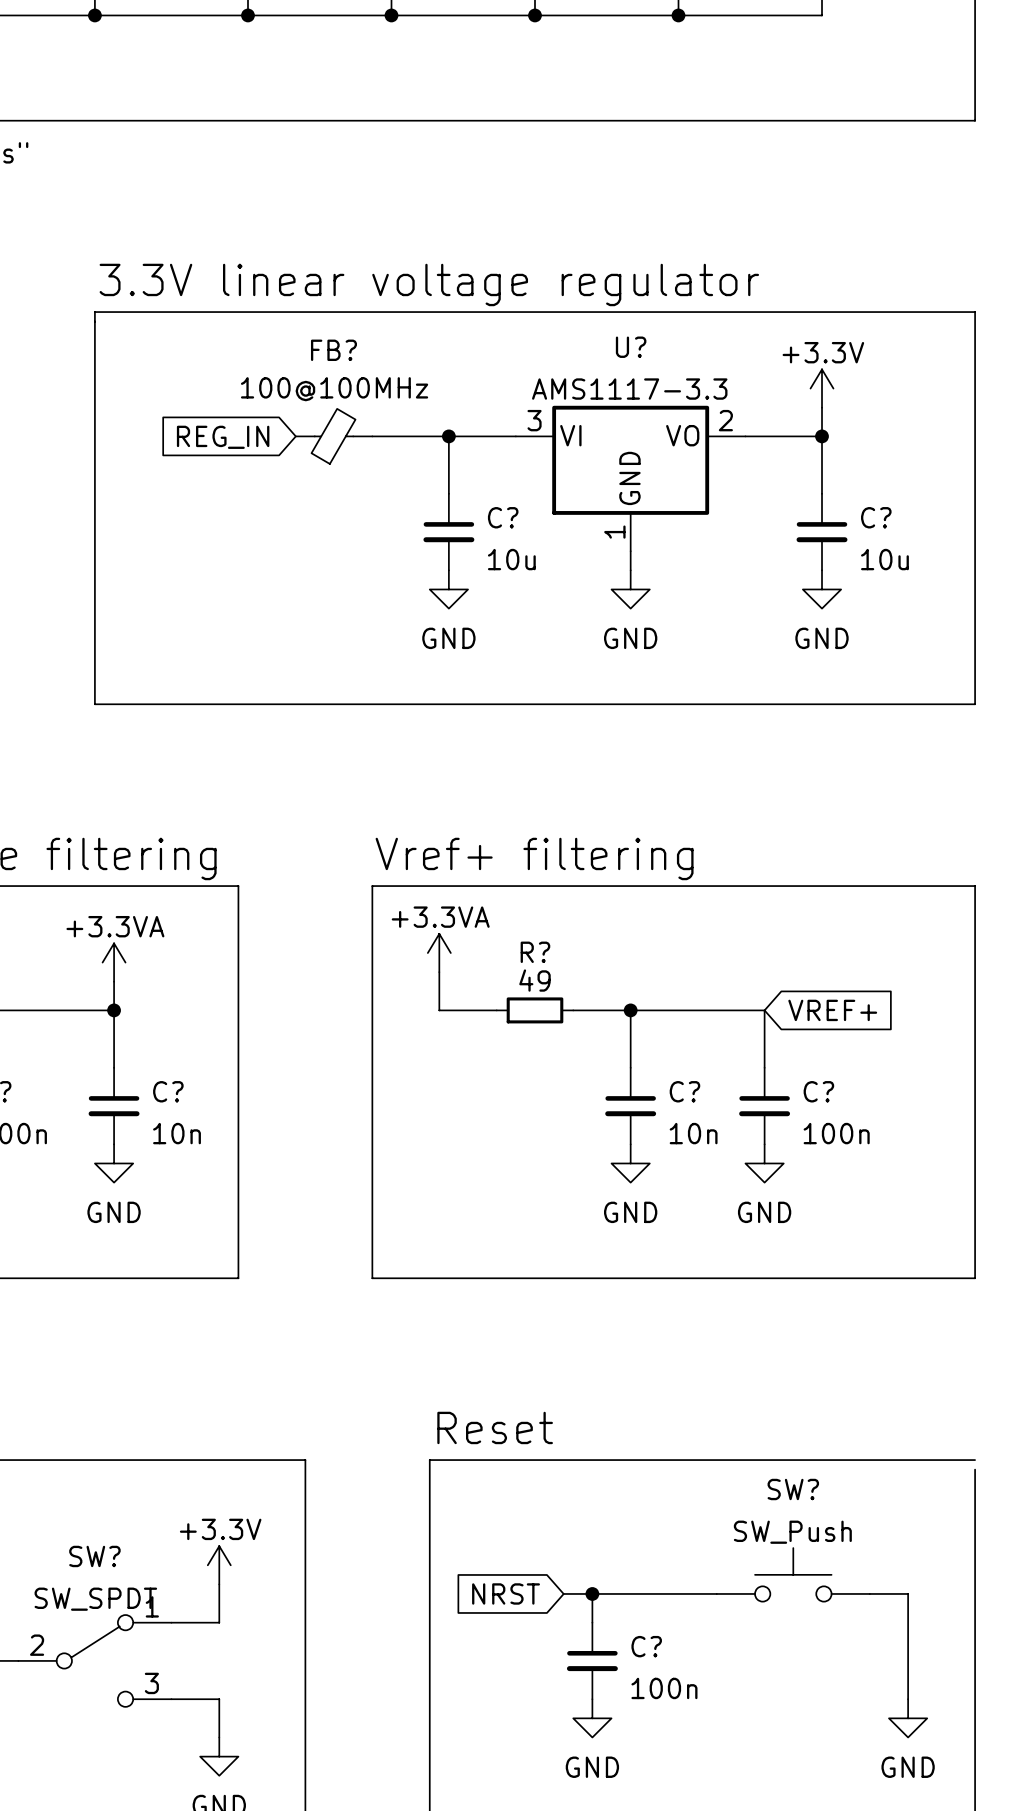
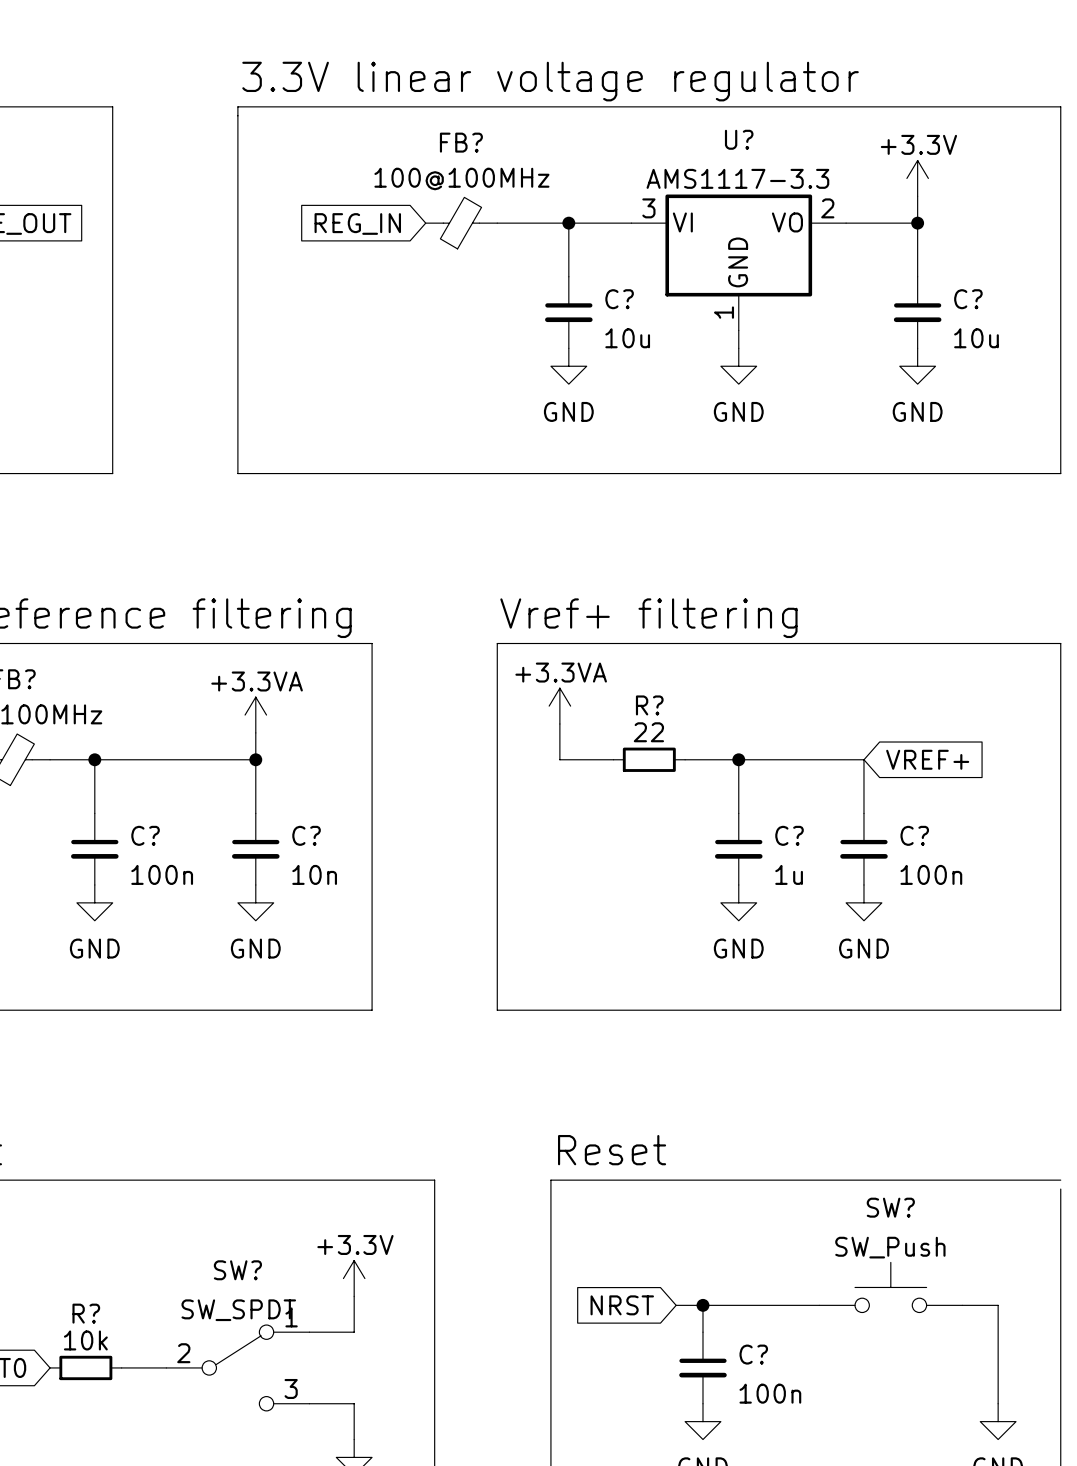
R? value: 49 (535, 980) -> 22 (648, 732)
C? value: 10n (693, 1133) -> 1u (789, 874)

